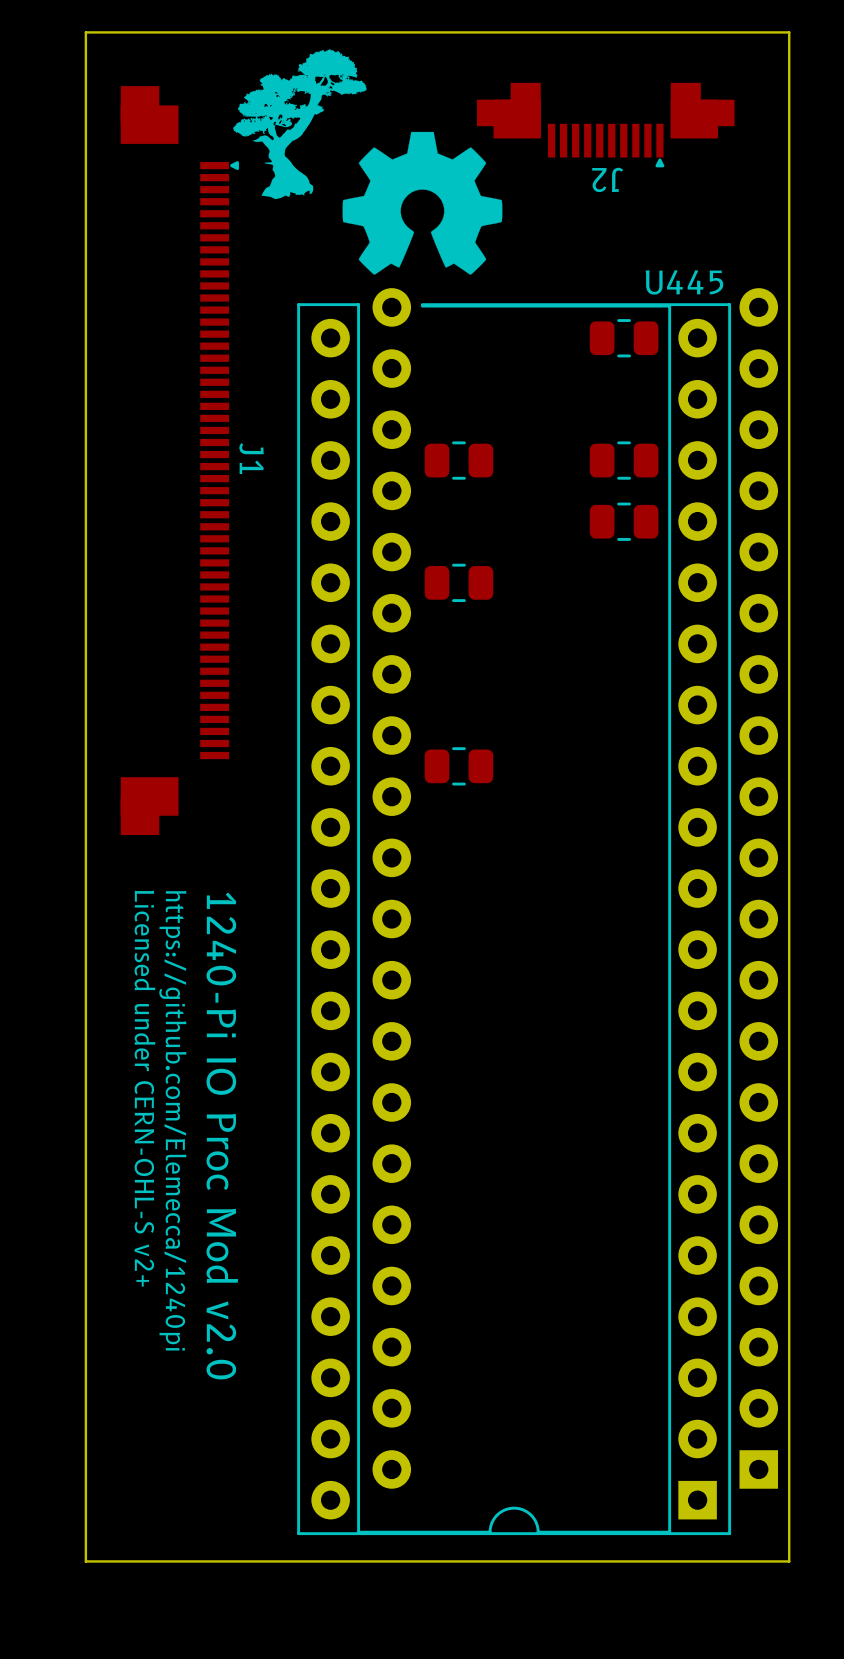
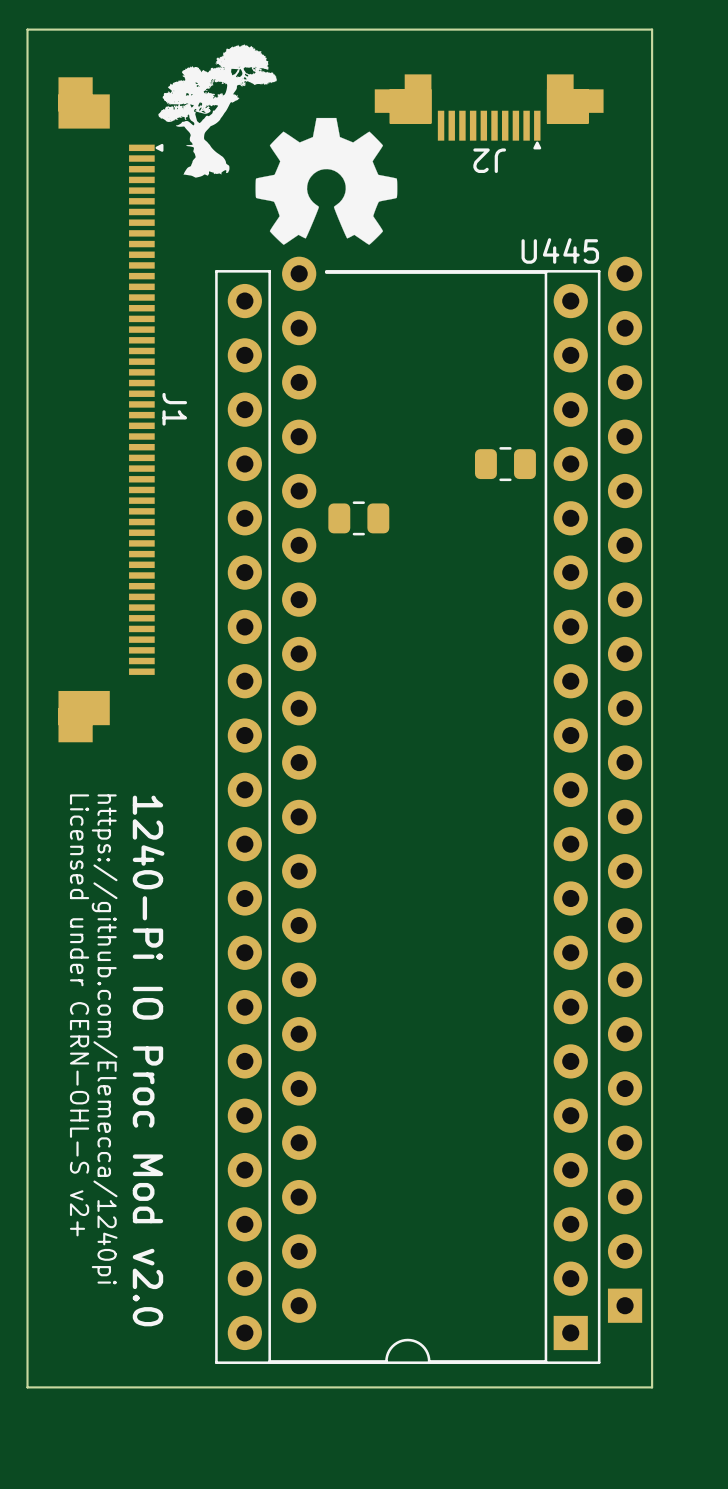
part: (624, 338) -> none
part: (458, 460) -> none
part: (624, 460) -> none
part: (458, 766) -> none

